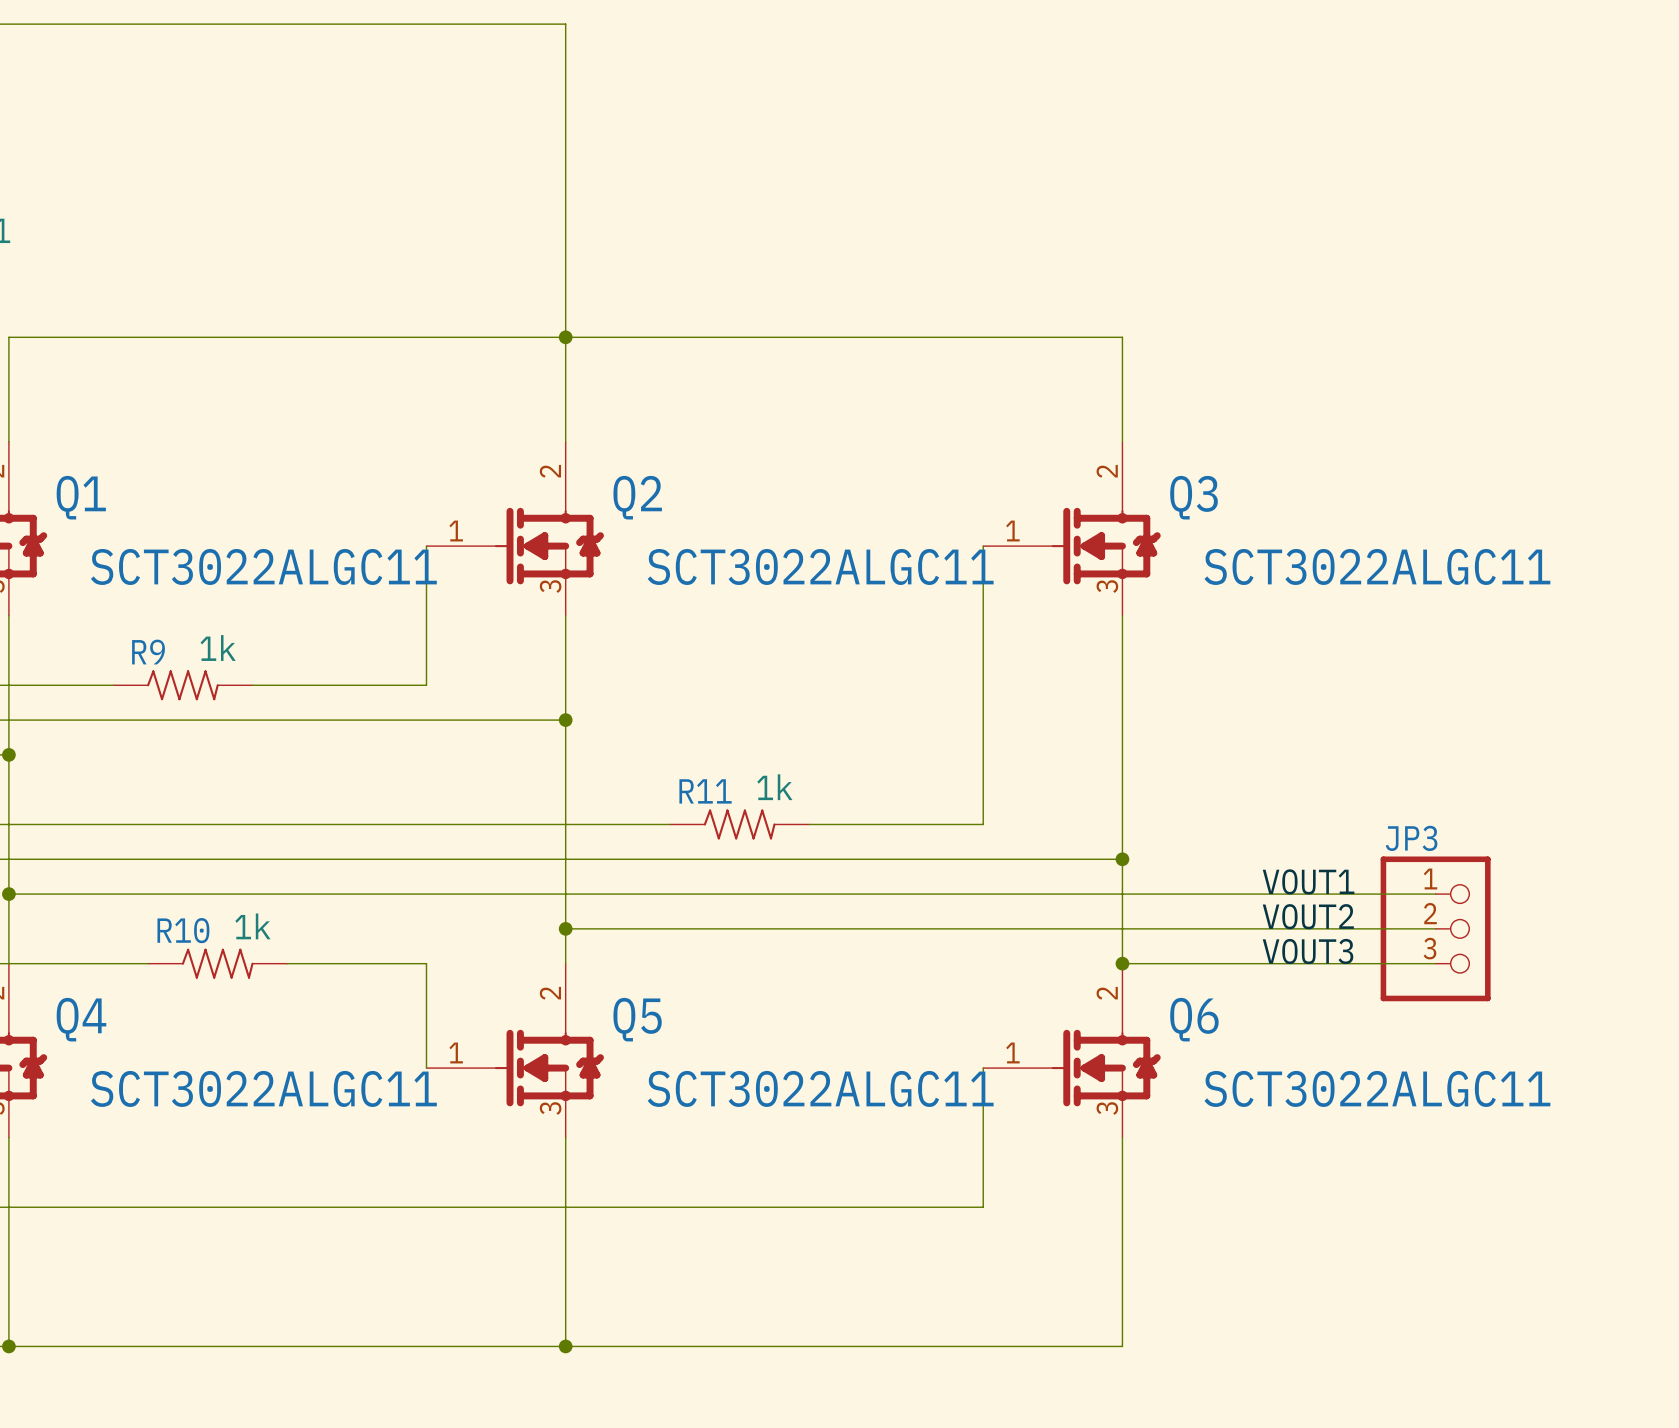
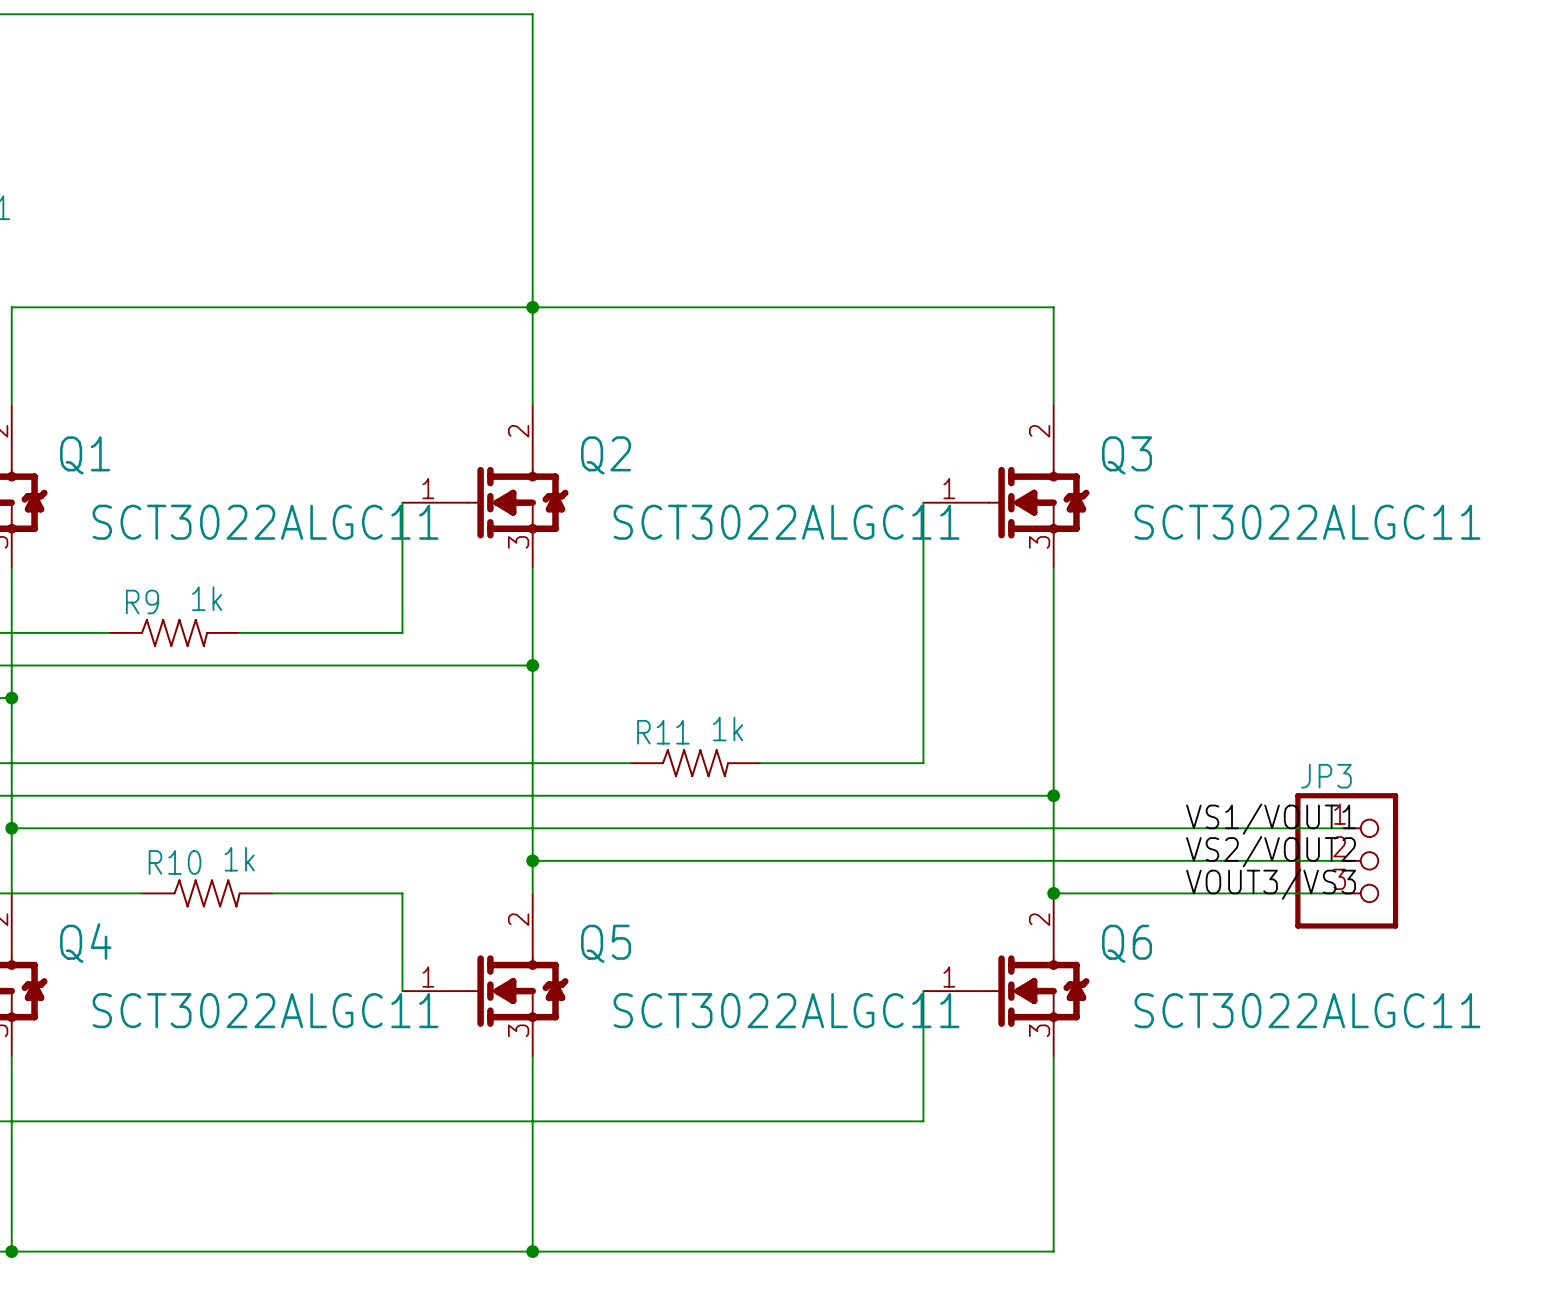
label: VOUT1 (1308, 881) -> VS1/VOUT1 (1271, 819)
label: VOUT2 (1308, 916) -> VS2/VOUT2 (1271, 851)
label: VOUT3 (1308, 951) -> VOUT3/VS3 (1271, 884)

